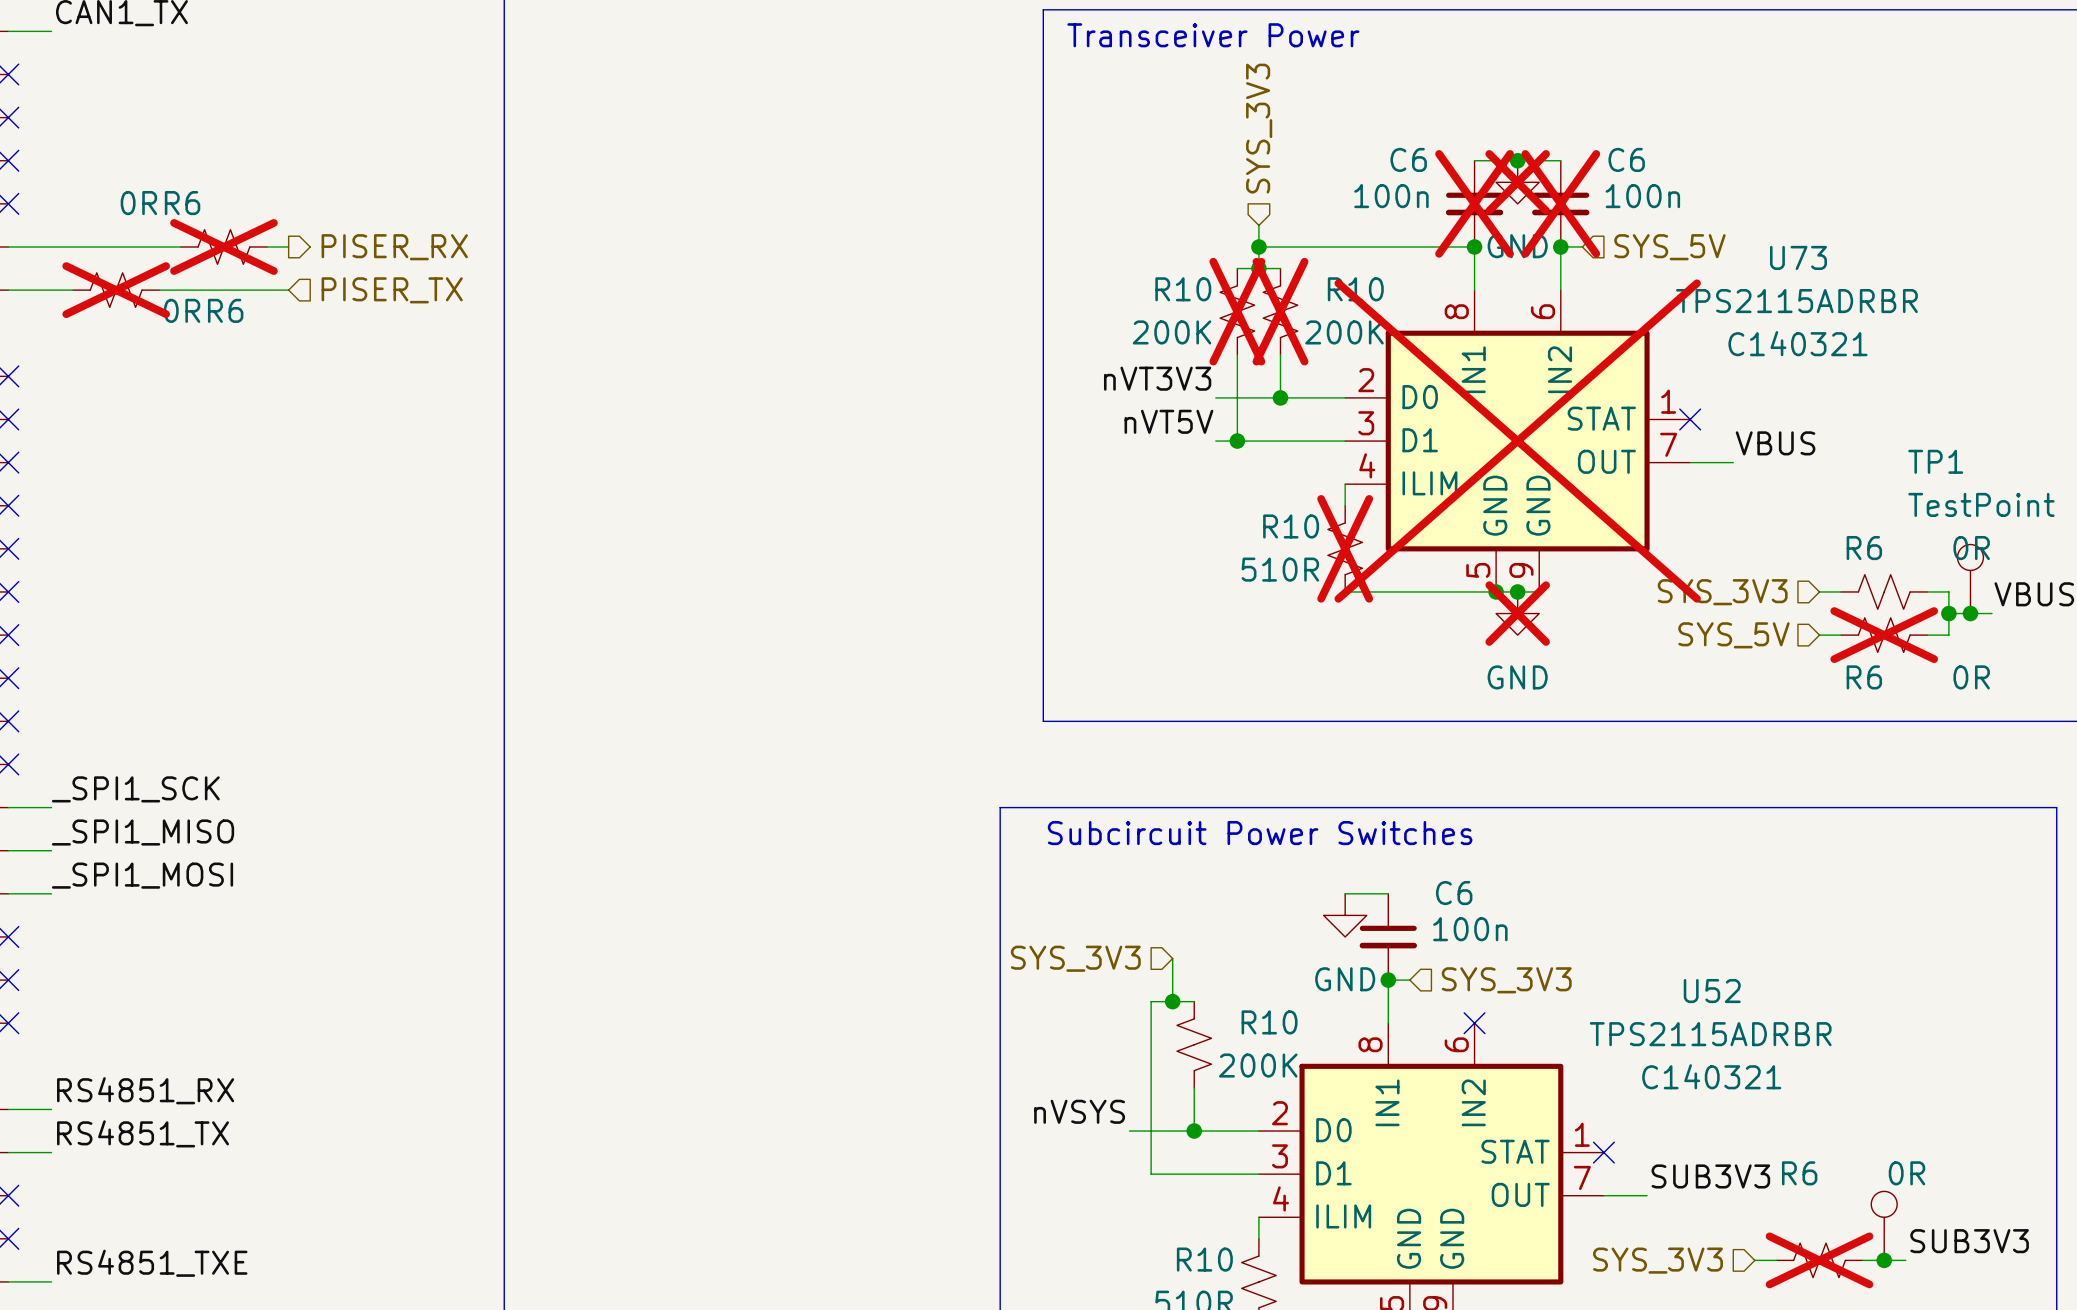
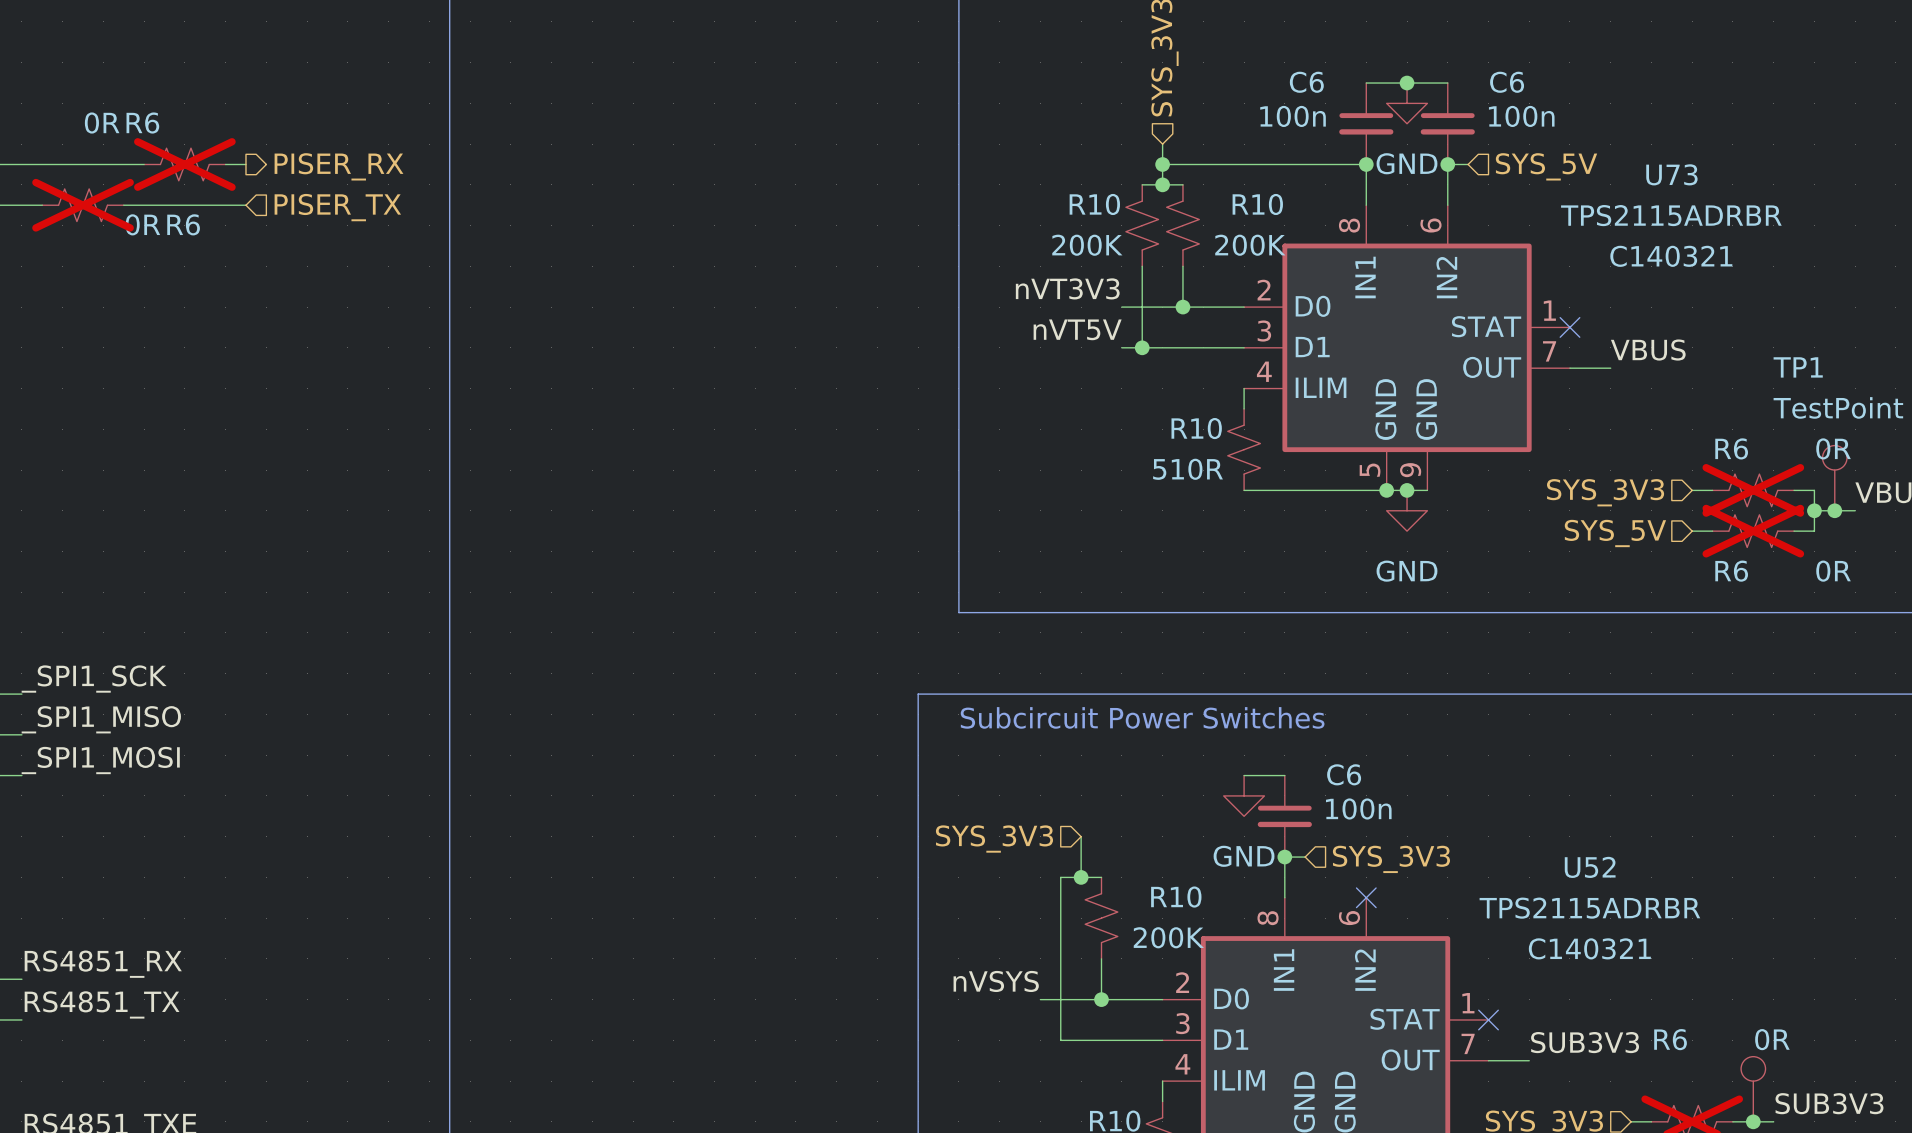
power symbol do-not-place cross: (1517, 182) -> none
C6 do-not-place cross: (1474, 203) -> none
C6 do-not-place cross: (1560, 203) -> none
R10 do-not-place cross: (1237, 311) -> none
R10 do-not-place cross: (1280, 311) -> none
U73 do-not-place cross: (1517, 441) -> none
R10 do-not-place cross: (1345, 548) -> none
R6 do-not-place cross: none -> (1753, 490)
power symbol do-not-place cross: (1517, 613) -> none

